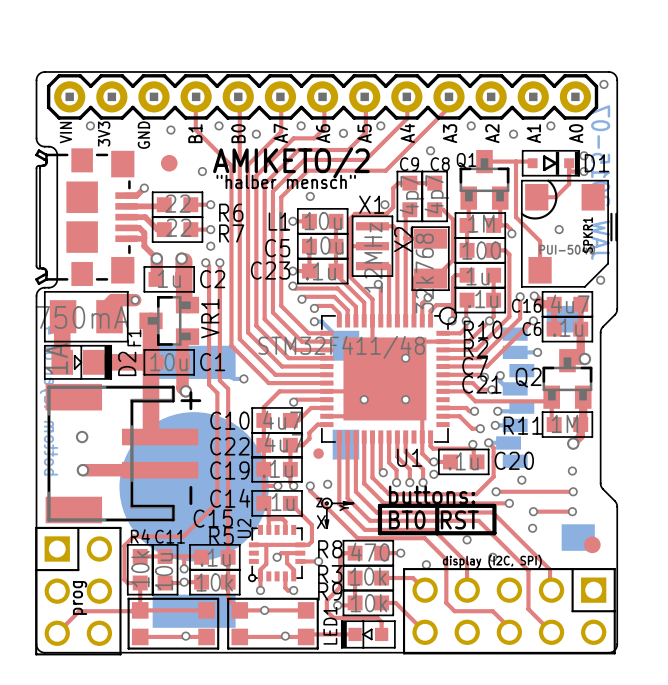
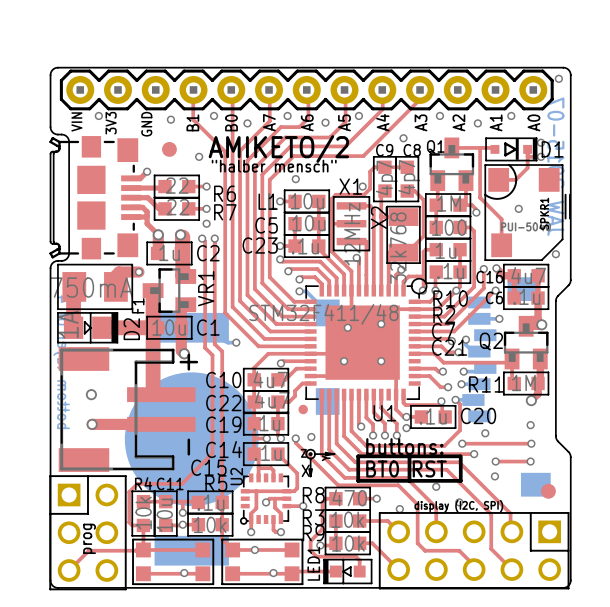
via: none -> (347, 327)

